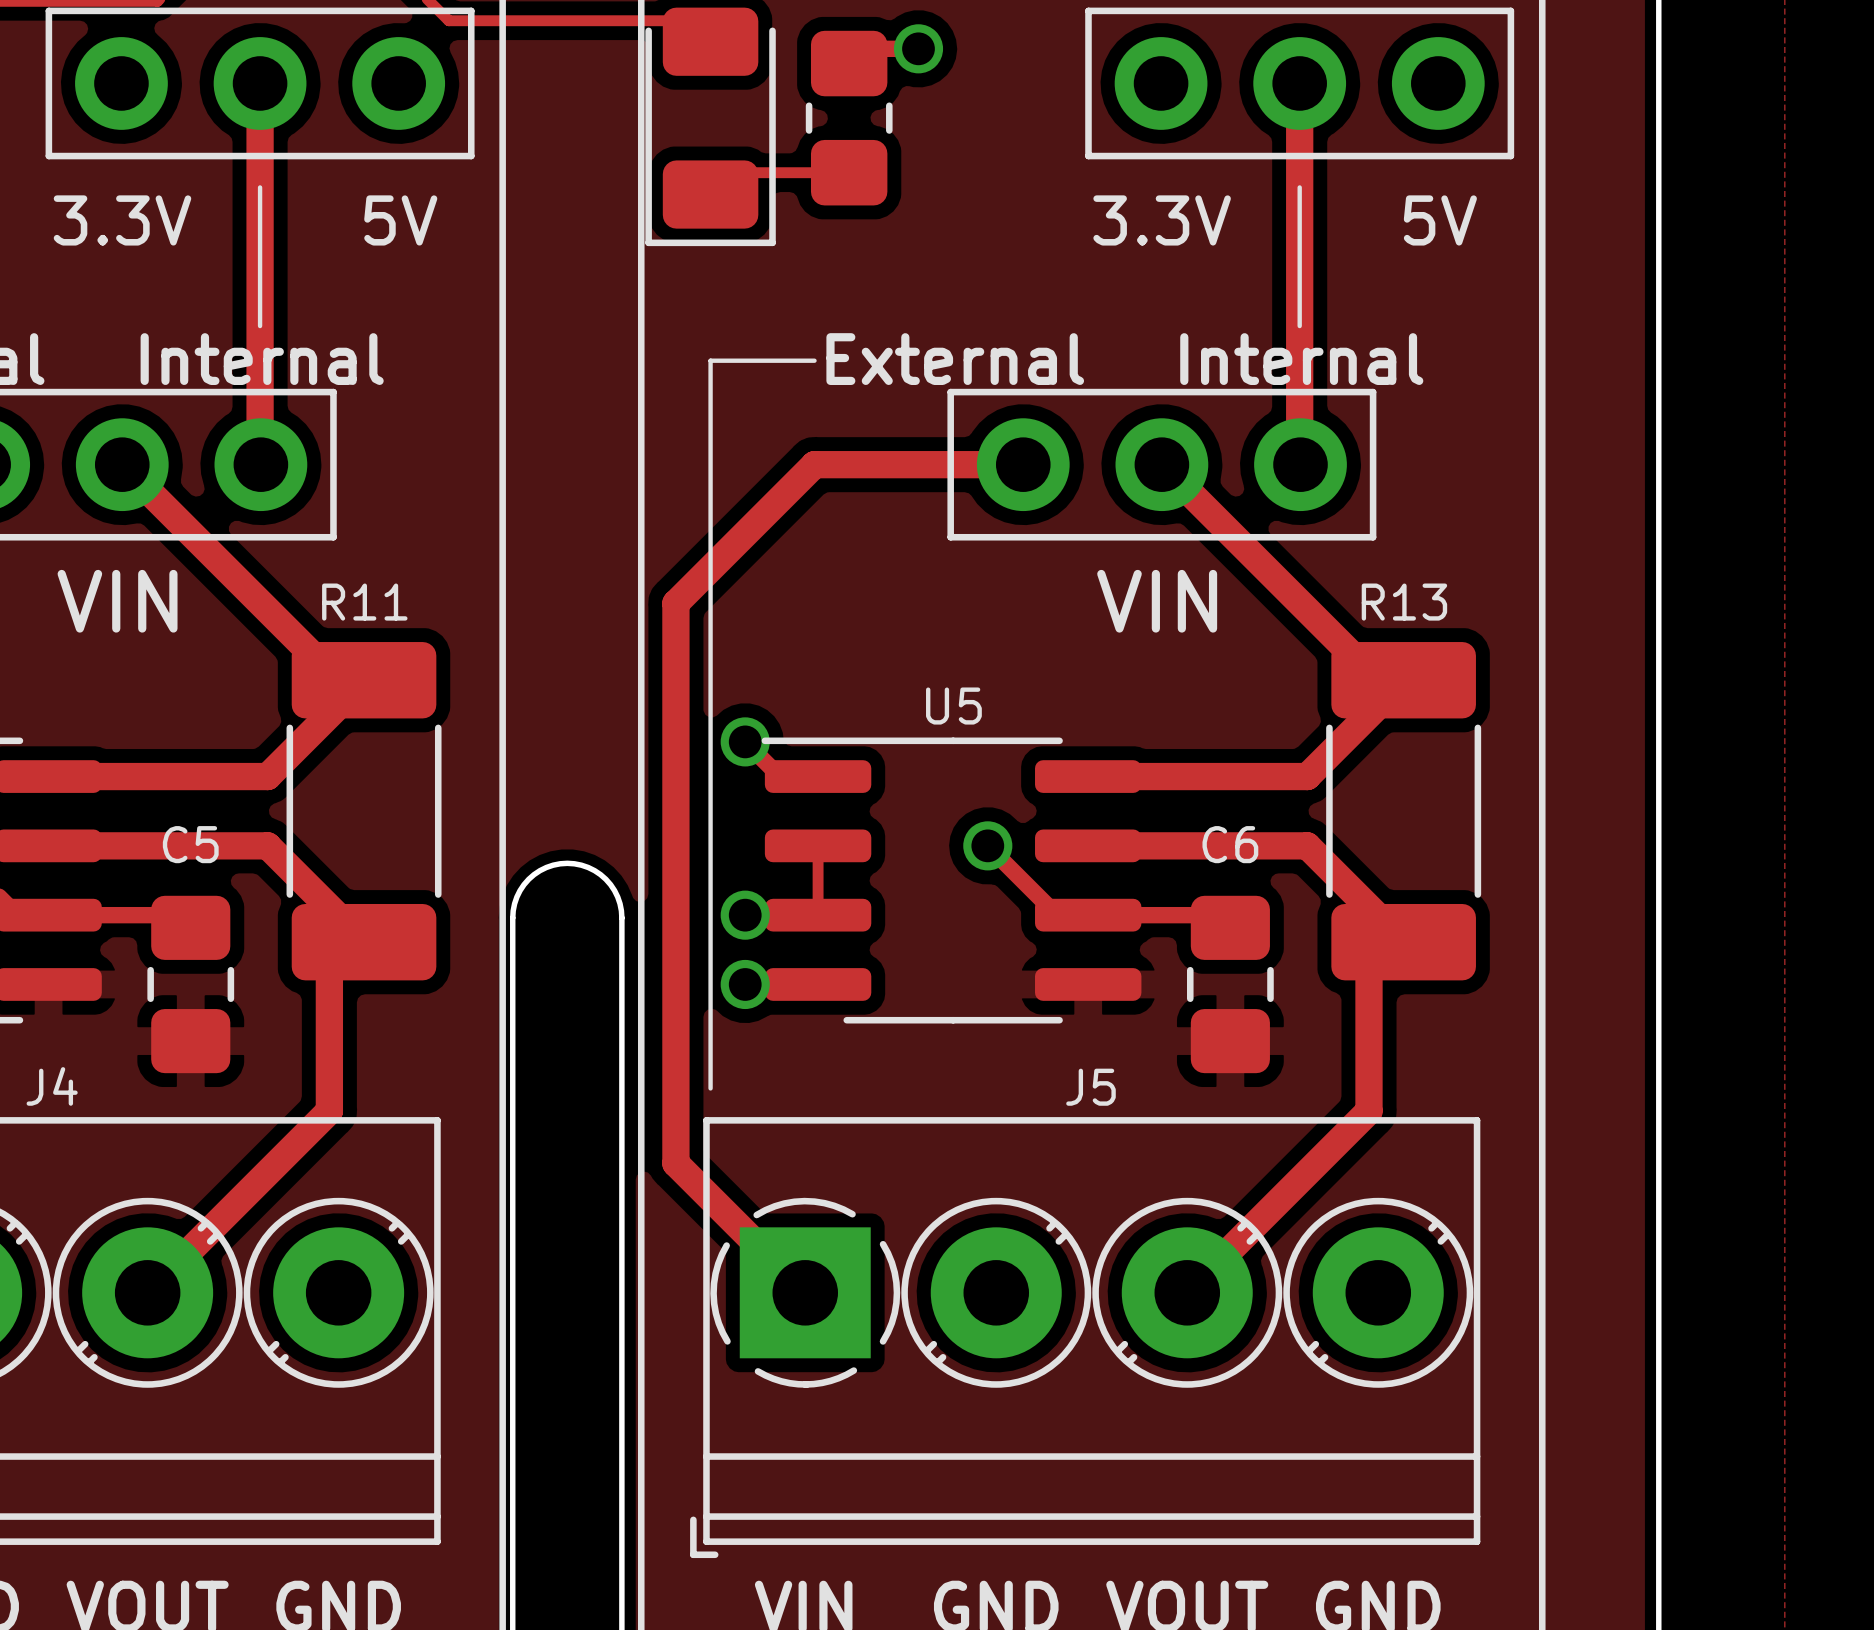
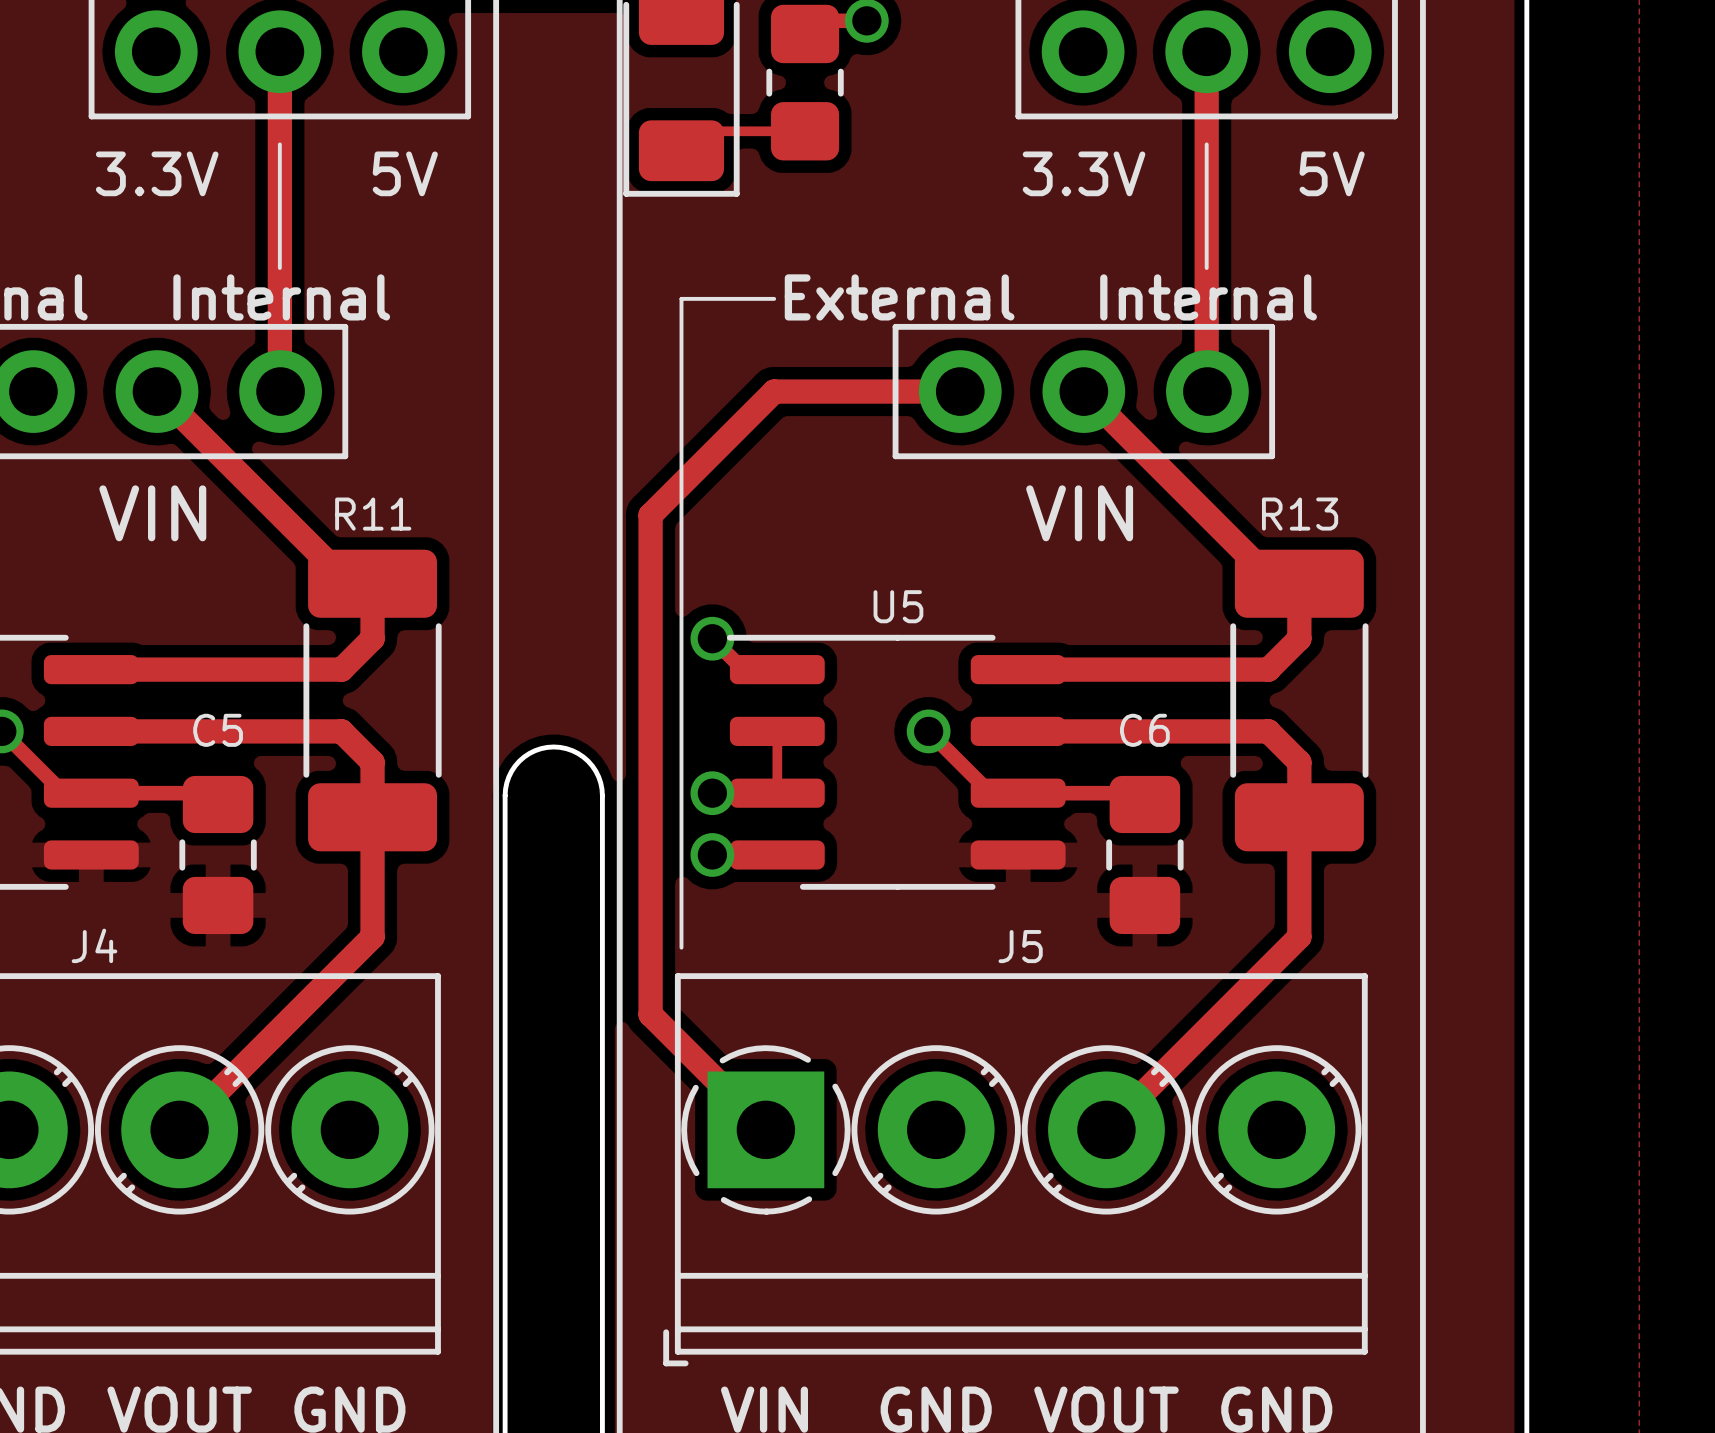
track: (364, 680) (267, 776) -> (341, 576) (349, 583) (372, 583) (372, 638) (341, 669) (286, 669)
track: (1403, 680) (1307, 776) -> (1268, 576) (1276, 583) (1299, 583) (1299, 638) (1268, 669) (1213, 669)
track: (267, 845) (364, 942) -> none
track: (1307, 845) (1403, 942) -> none
track: (329, 942) (329, 1111) -> (286, 731) (341, 731) (372, 762) (372, 936) (341, 967)
track: (1368, 942) (1368, 1111) -> (1213, 731) (1268, 731) (1299, 762) (1299, 936) (1268, 967)

